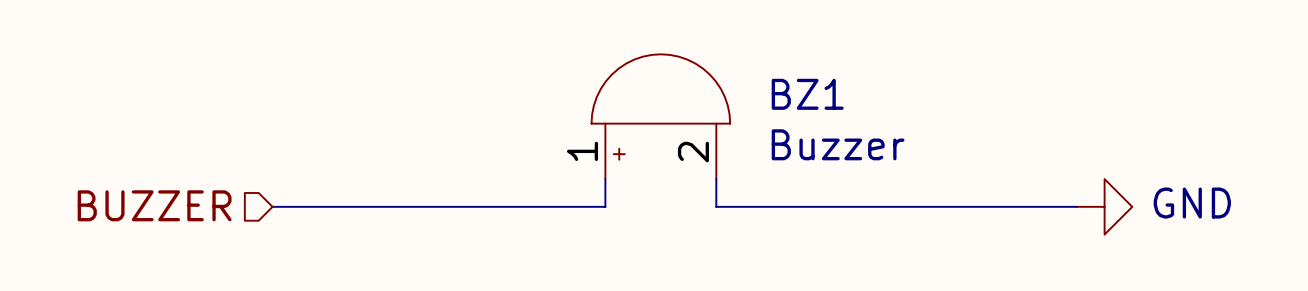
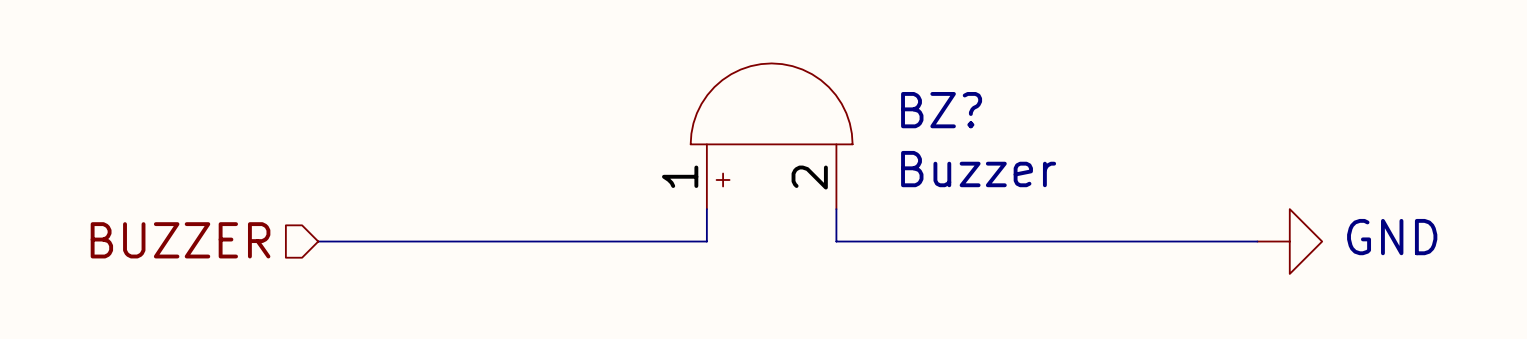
BZ1 name: BZ1 (807, 94) -> BZ? (941, 110)

